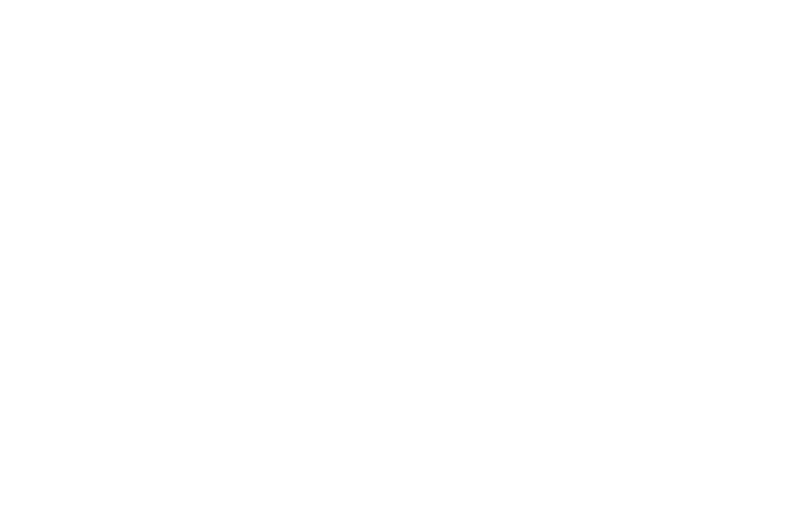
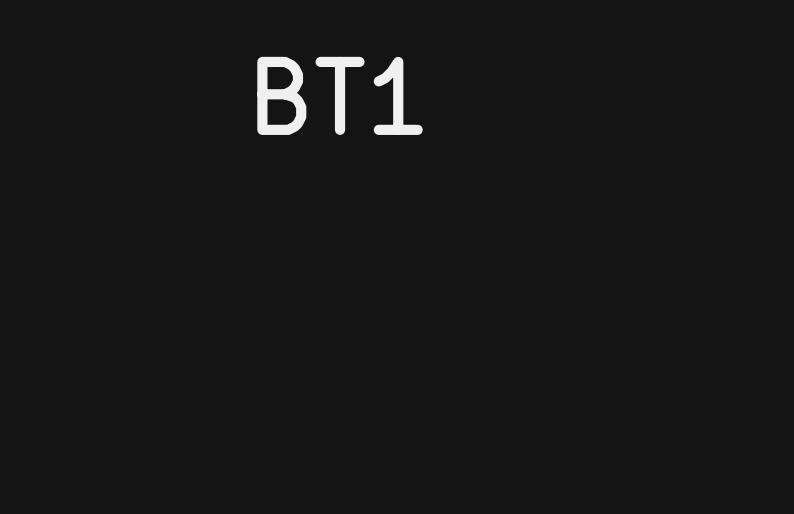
BT1: none -> (340, 95)

